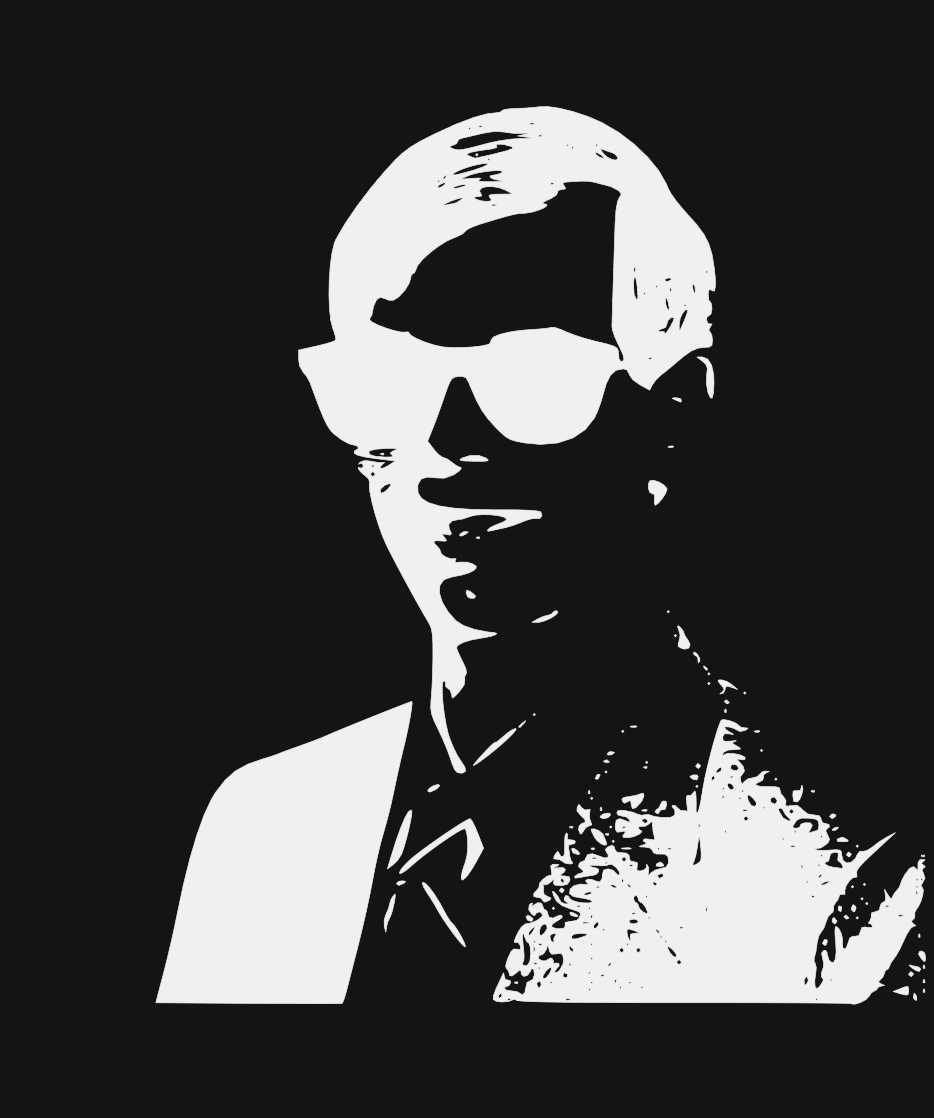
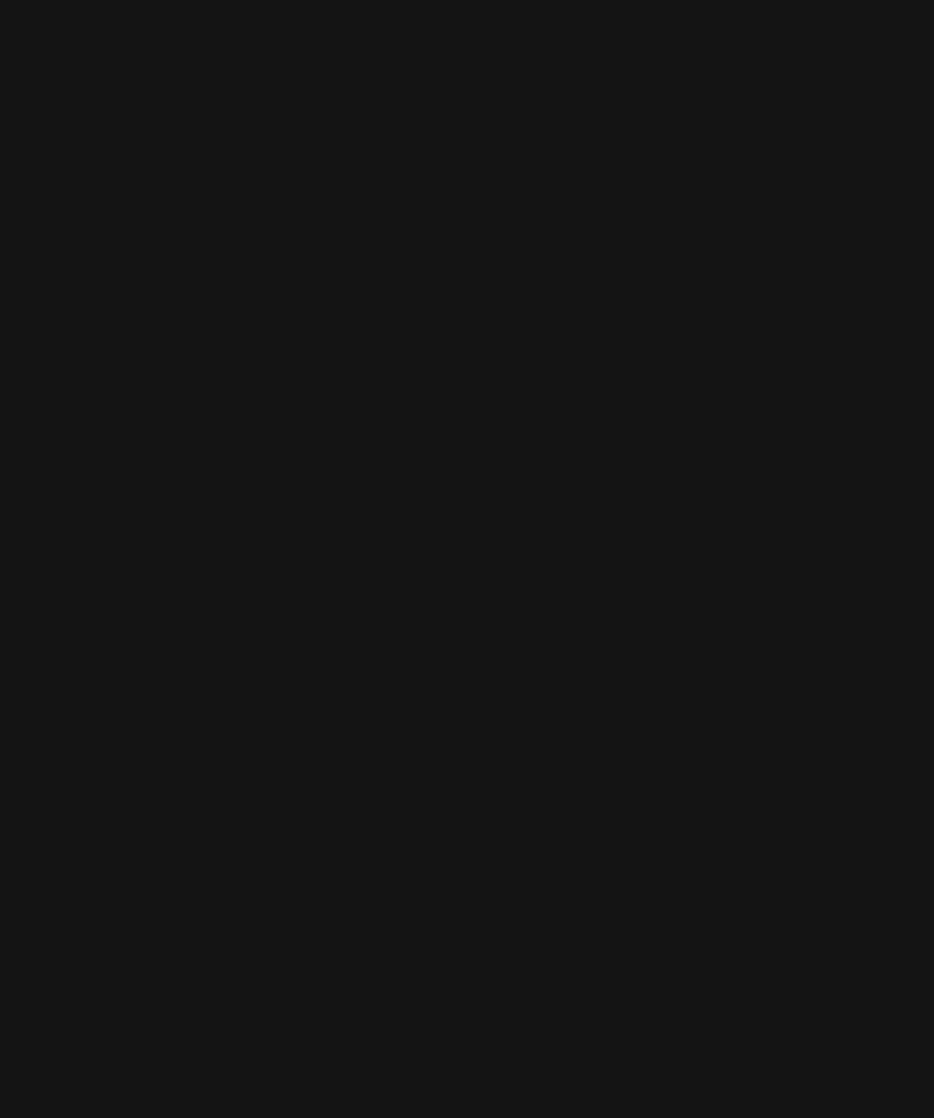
drawing: [155, 106, 926, 1005] -> none

